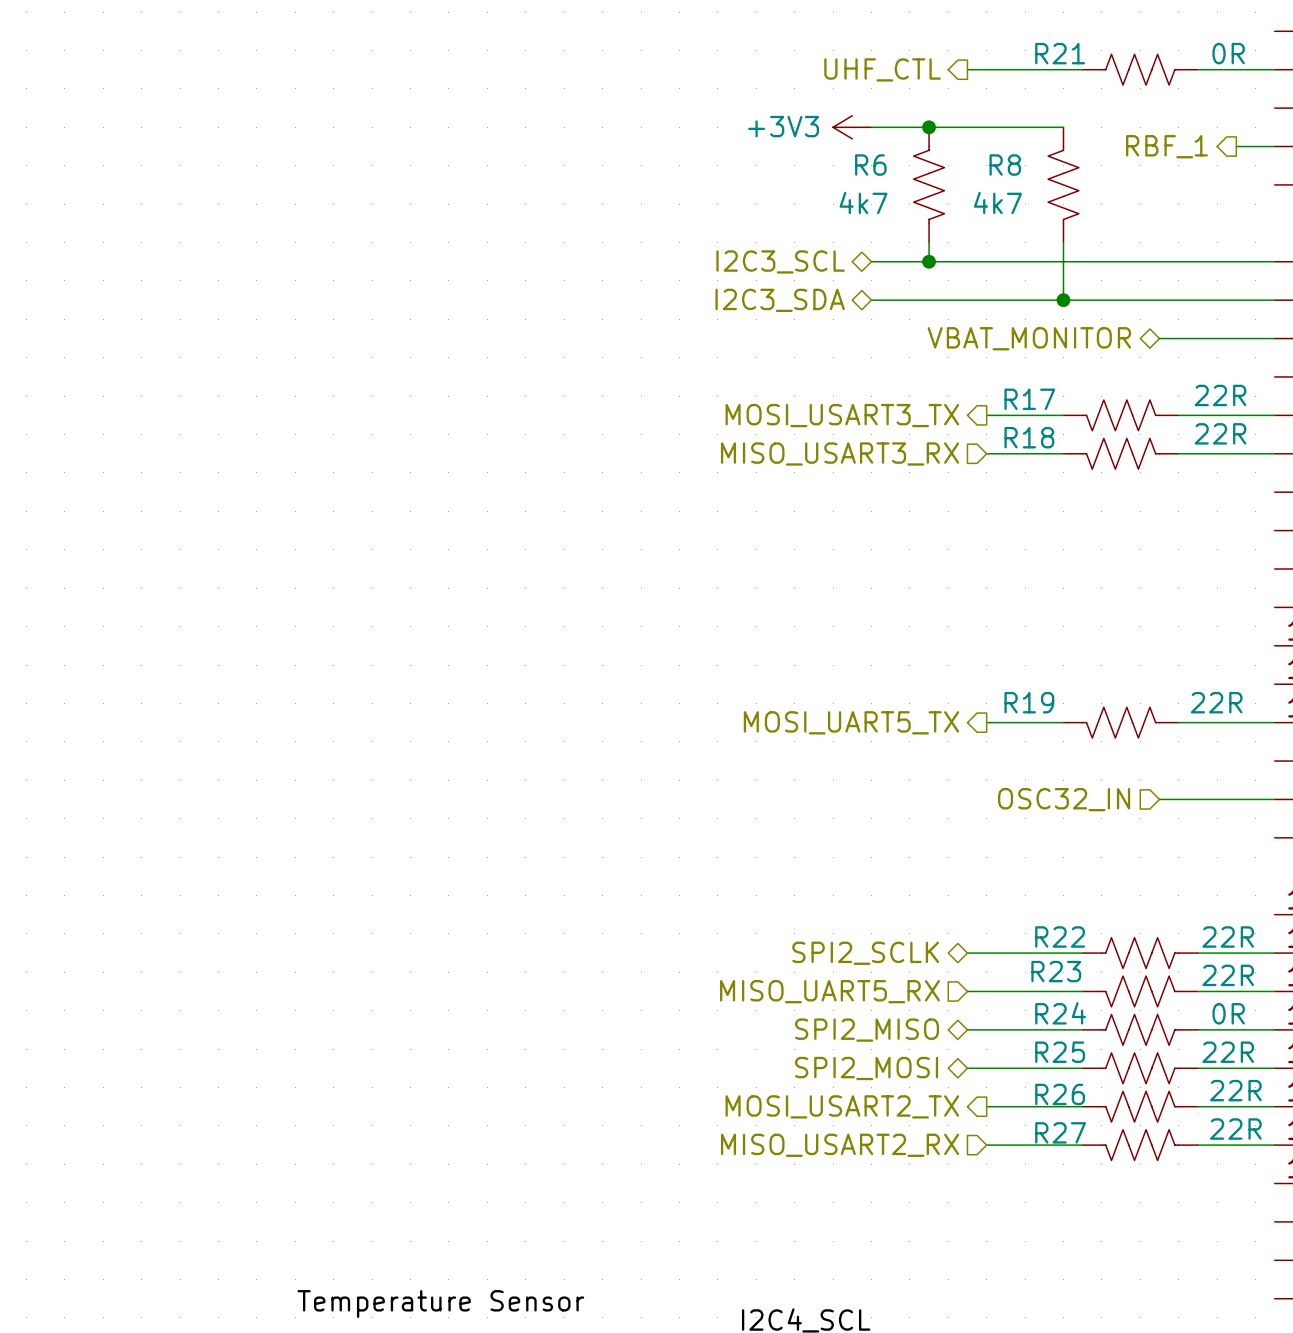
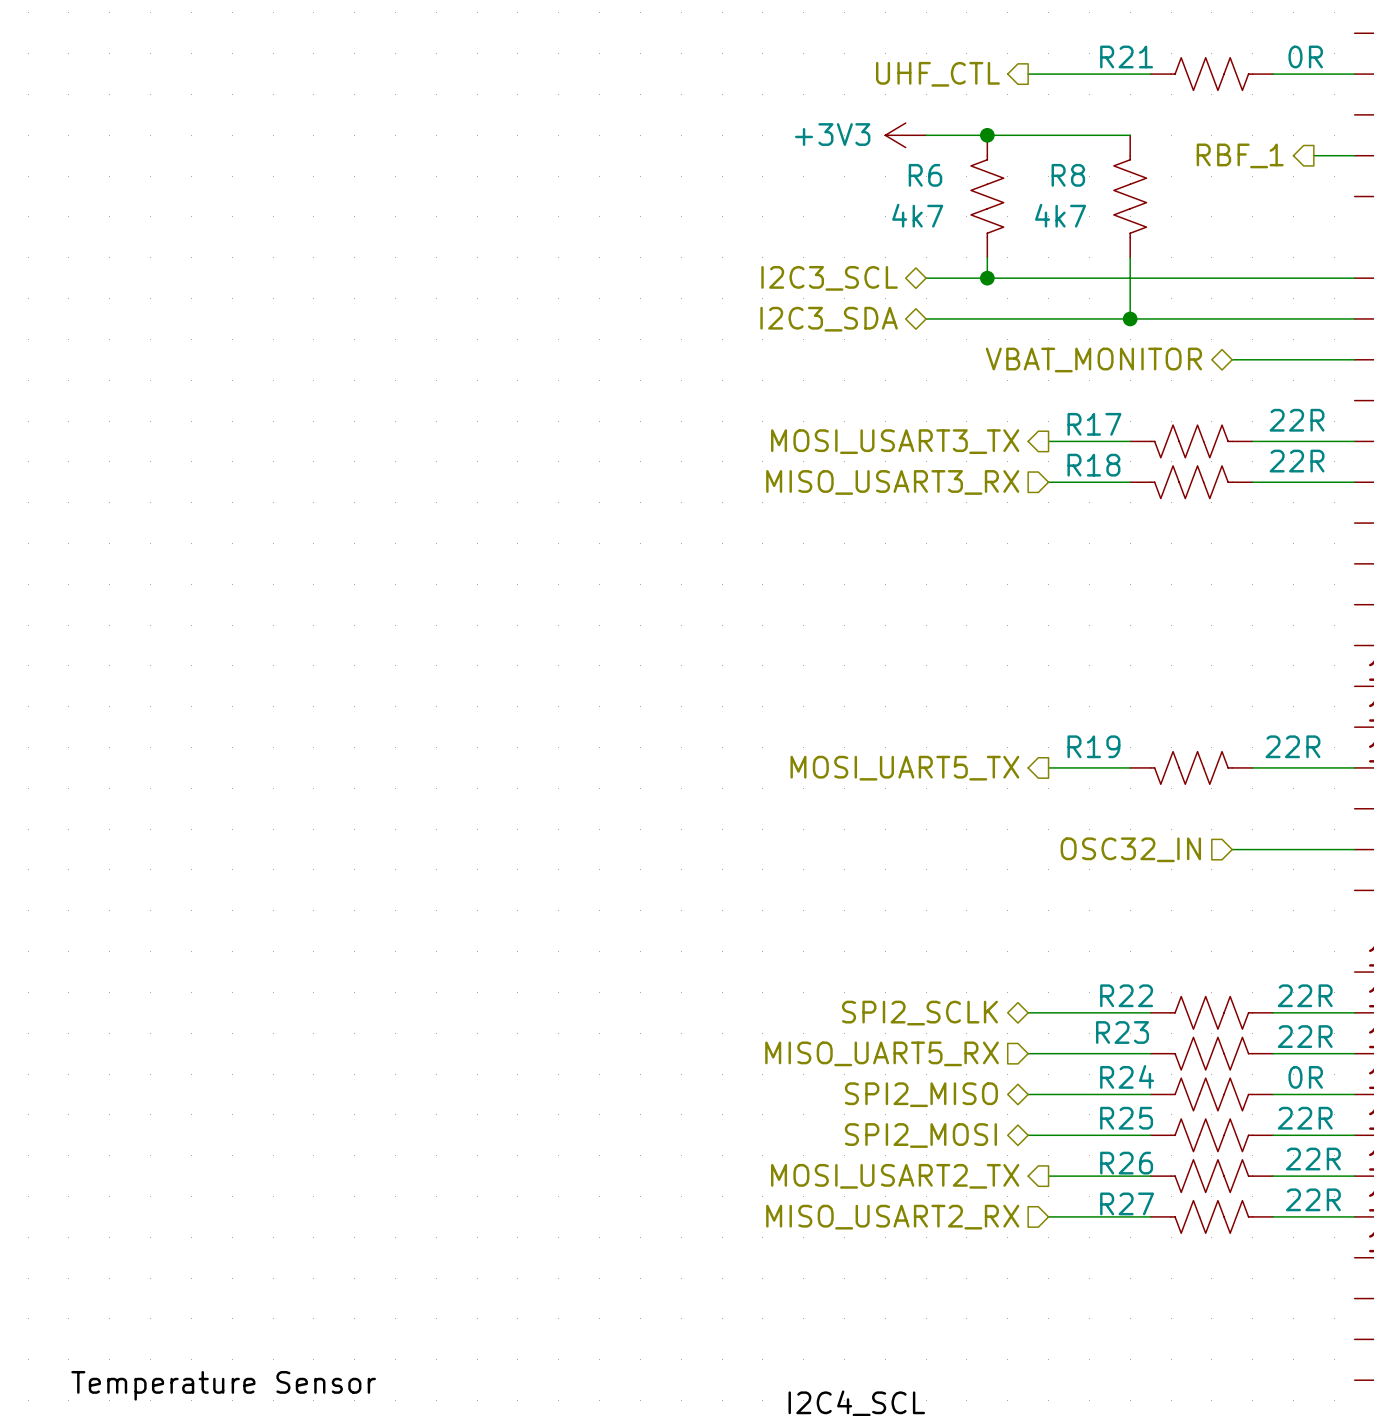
label position: Temperature Sensor (440, 1304) -> Temperature Sensor (223, 1385)

